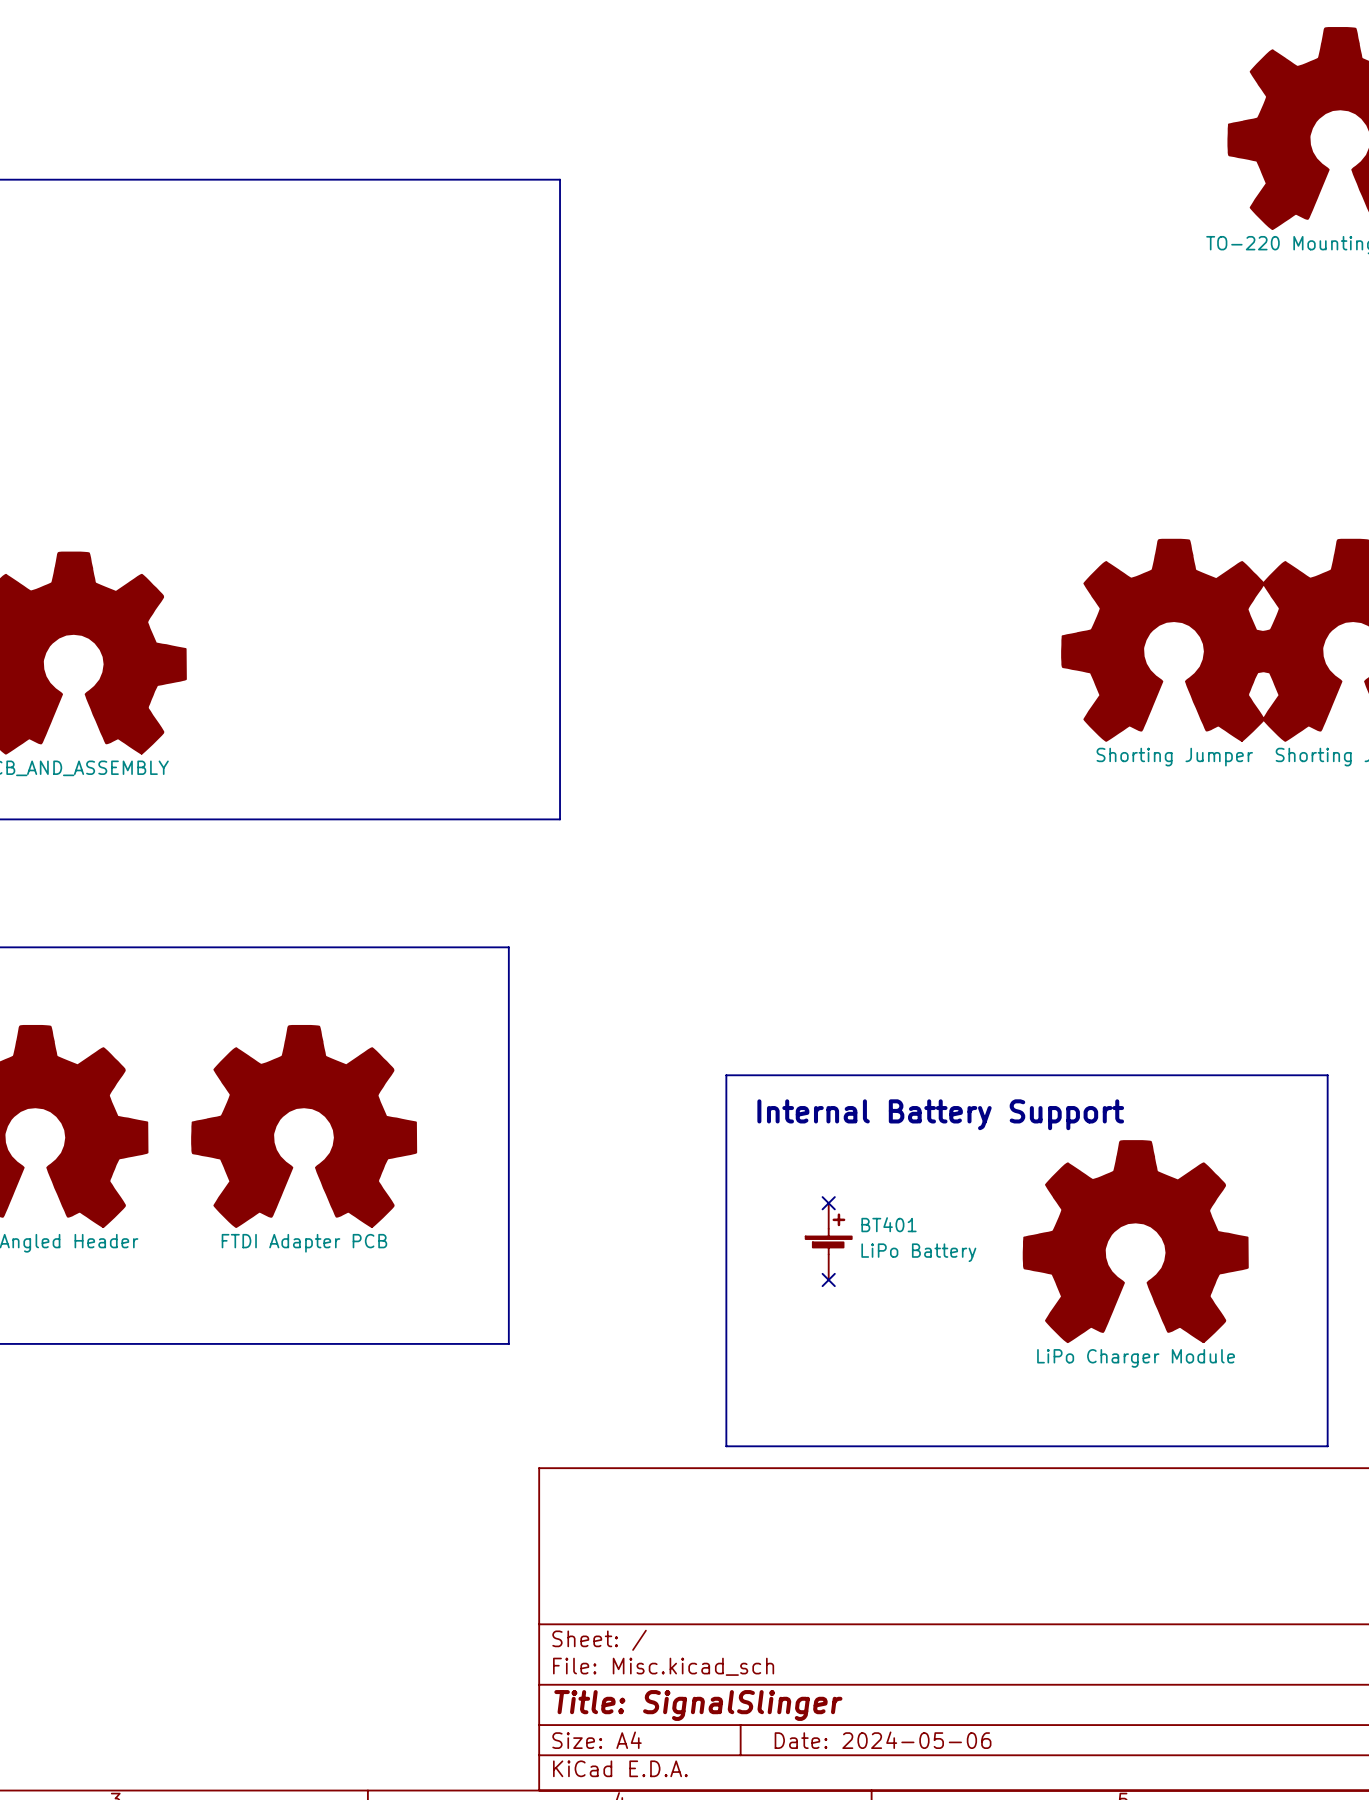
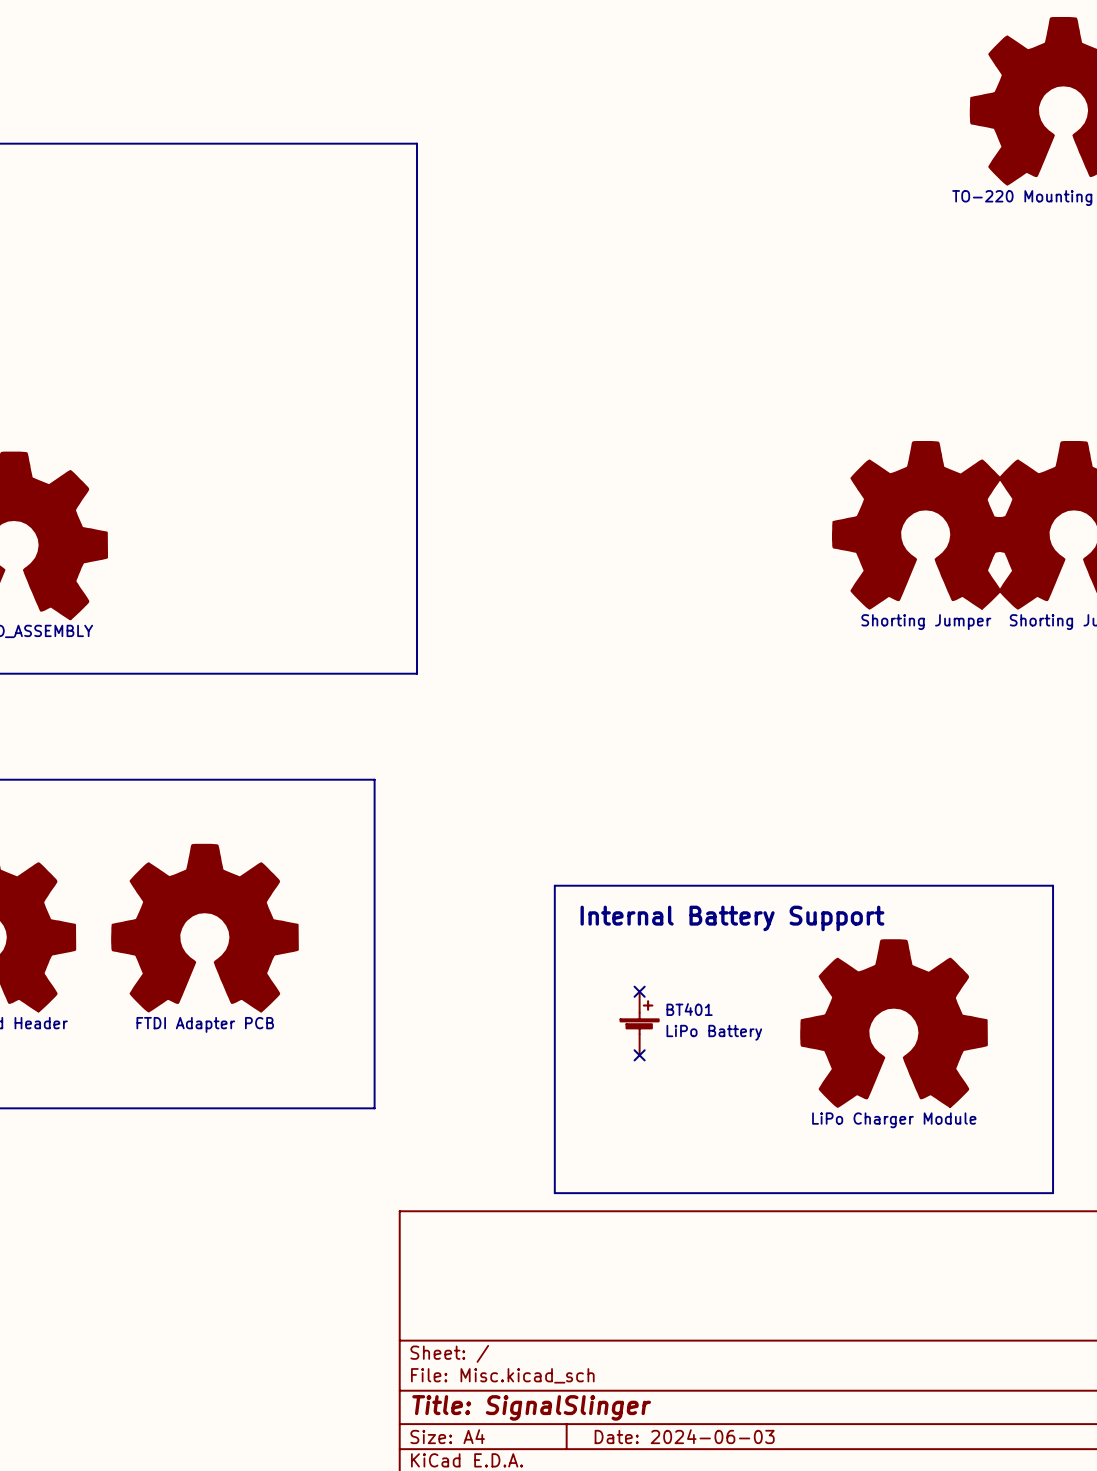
title block: Date: 2024-05-06 (883, 1740) -> Date: 2024-06-03 (684, 1436)

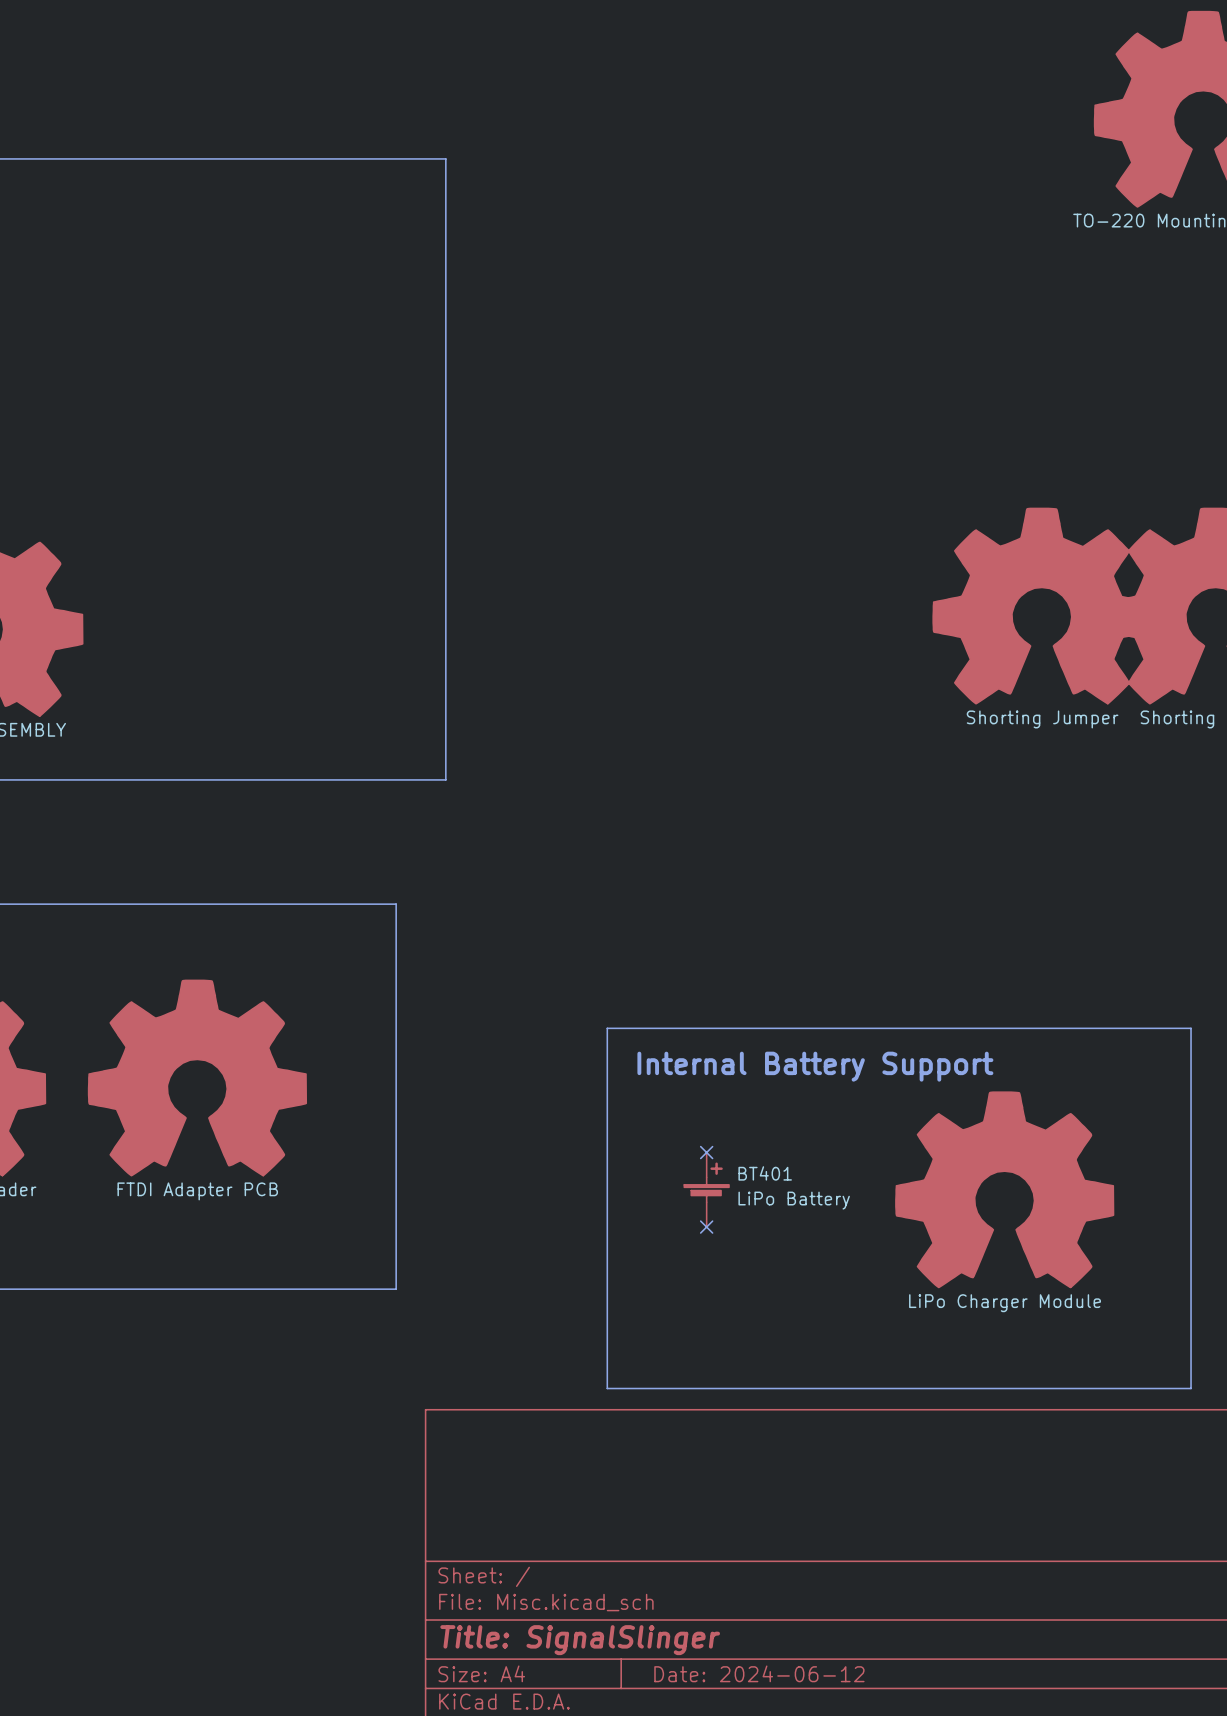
title block: Date: 2024-06-03 (684, 1436) -> Date: 2024-06-12 (759, 1673)

